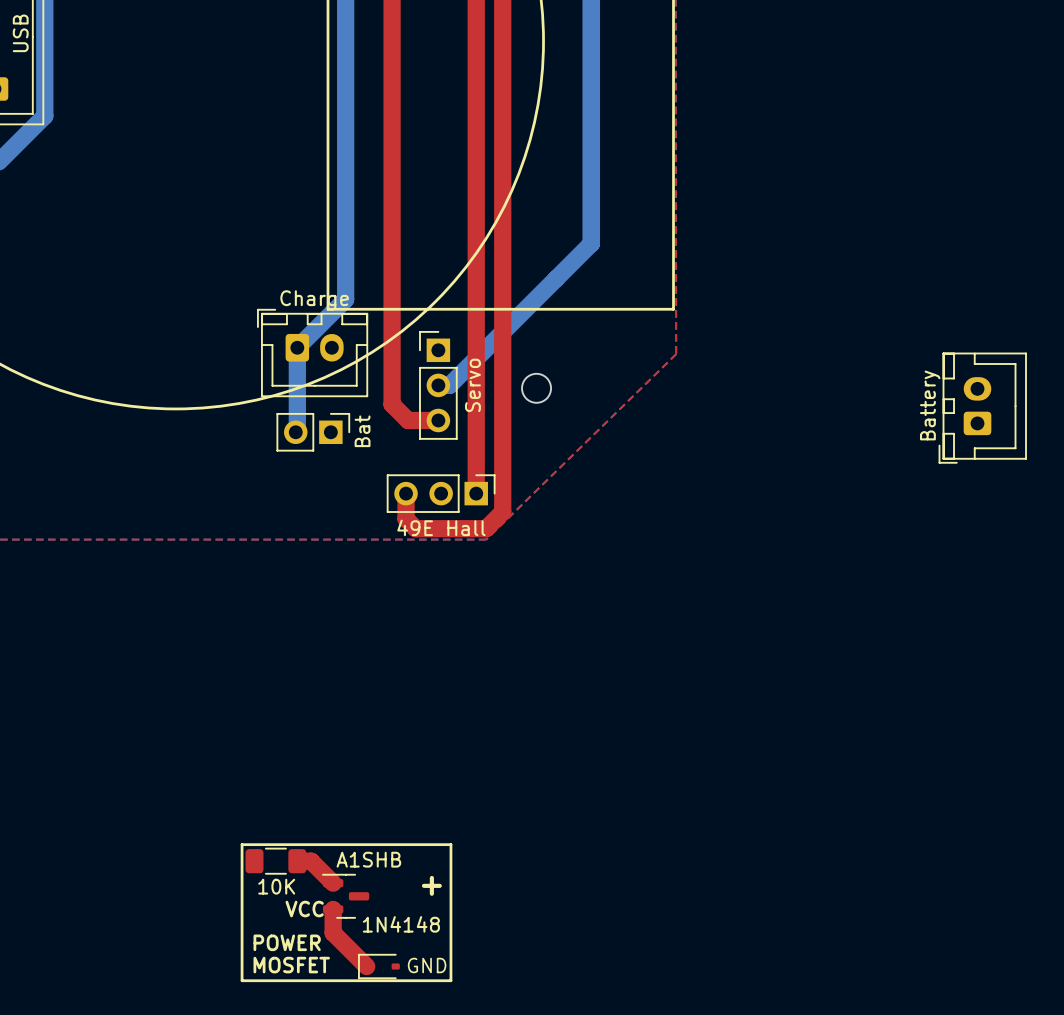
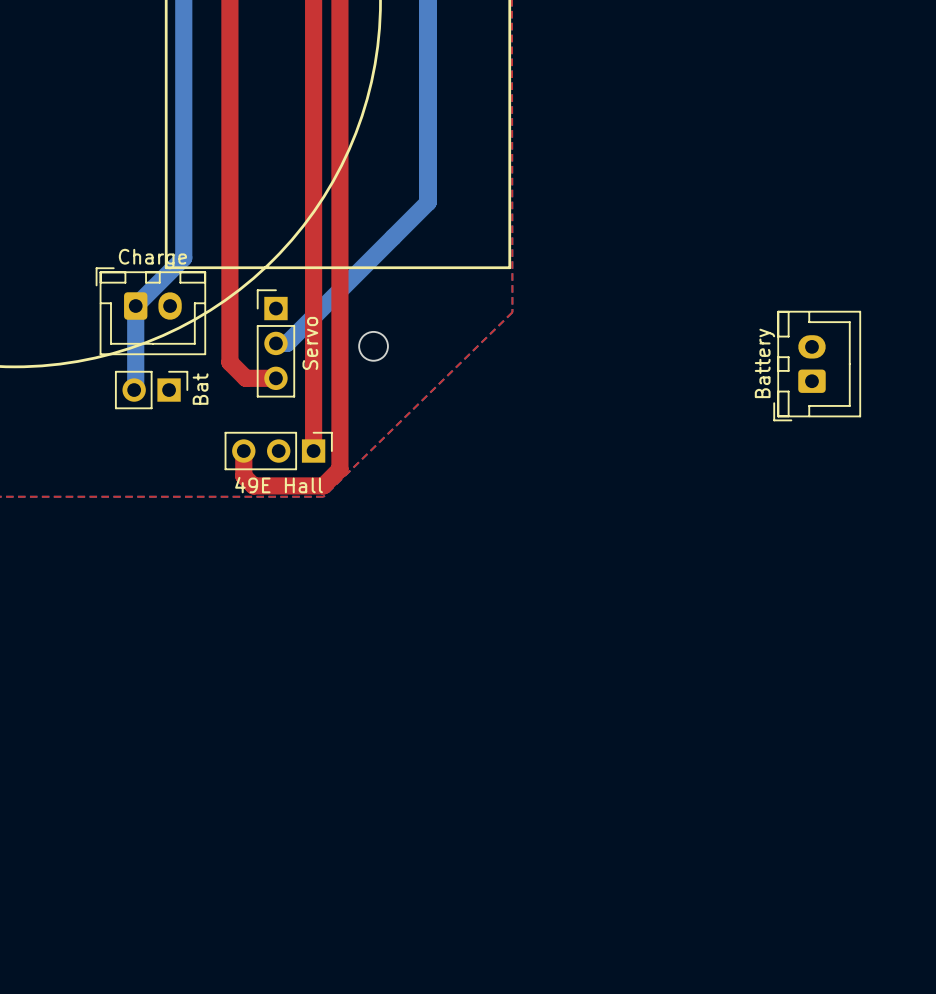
line: (242, 844) (450, 844) (450, 980) (242, 980) (242, 844) -> none
10K: (275, 861) -> none
top track: (297, 861) (311, 861) (333, 883) -> none
text: + (431, 885) -> none
A1SHB: (345, 896) -> none
text: VCC (304, 909) -> none
top track: (333, 909) (333, 932) (366, 966) -> none
text: POWER (287, 942) -> none
text: MOSFET (291, 965) -> none
text: GND (427, 965) -> none
1N4148: (379, 966) -> none

